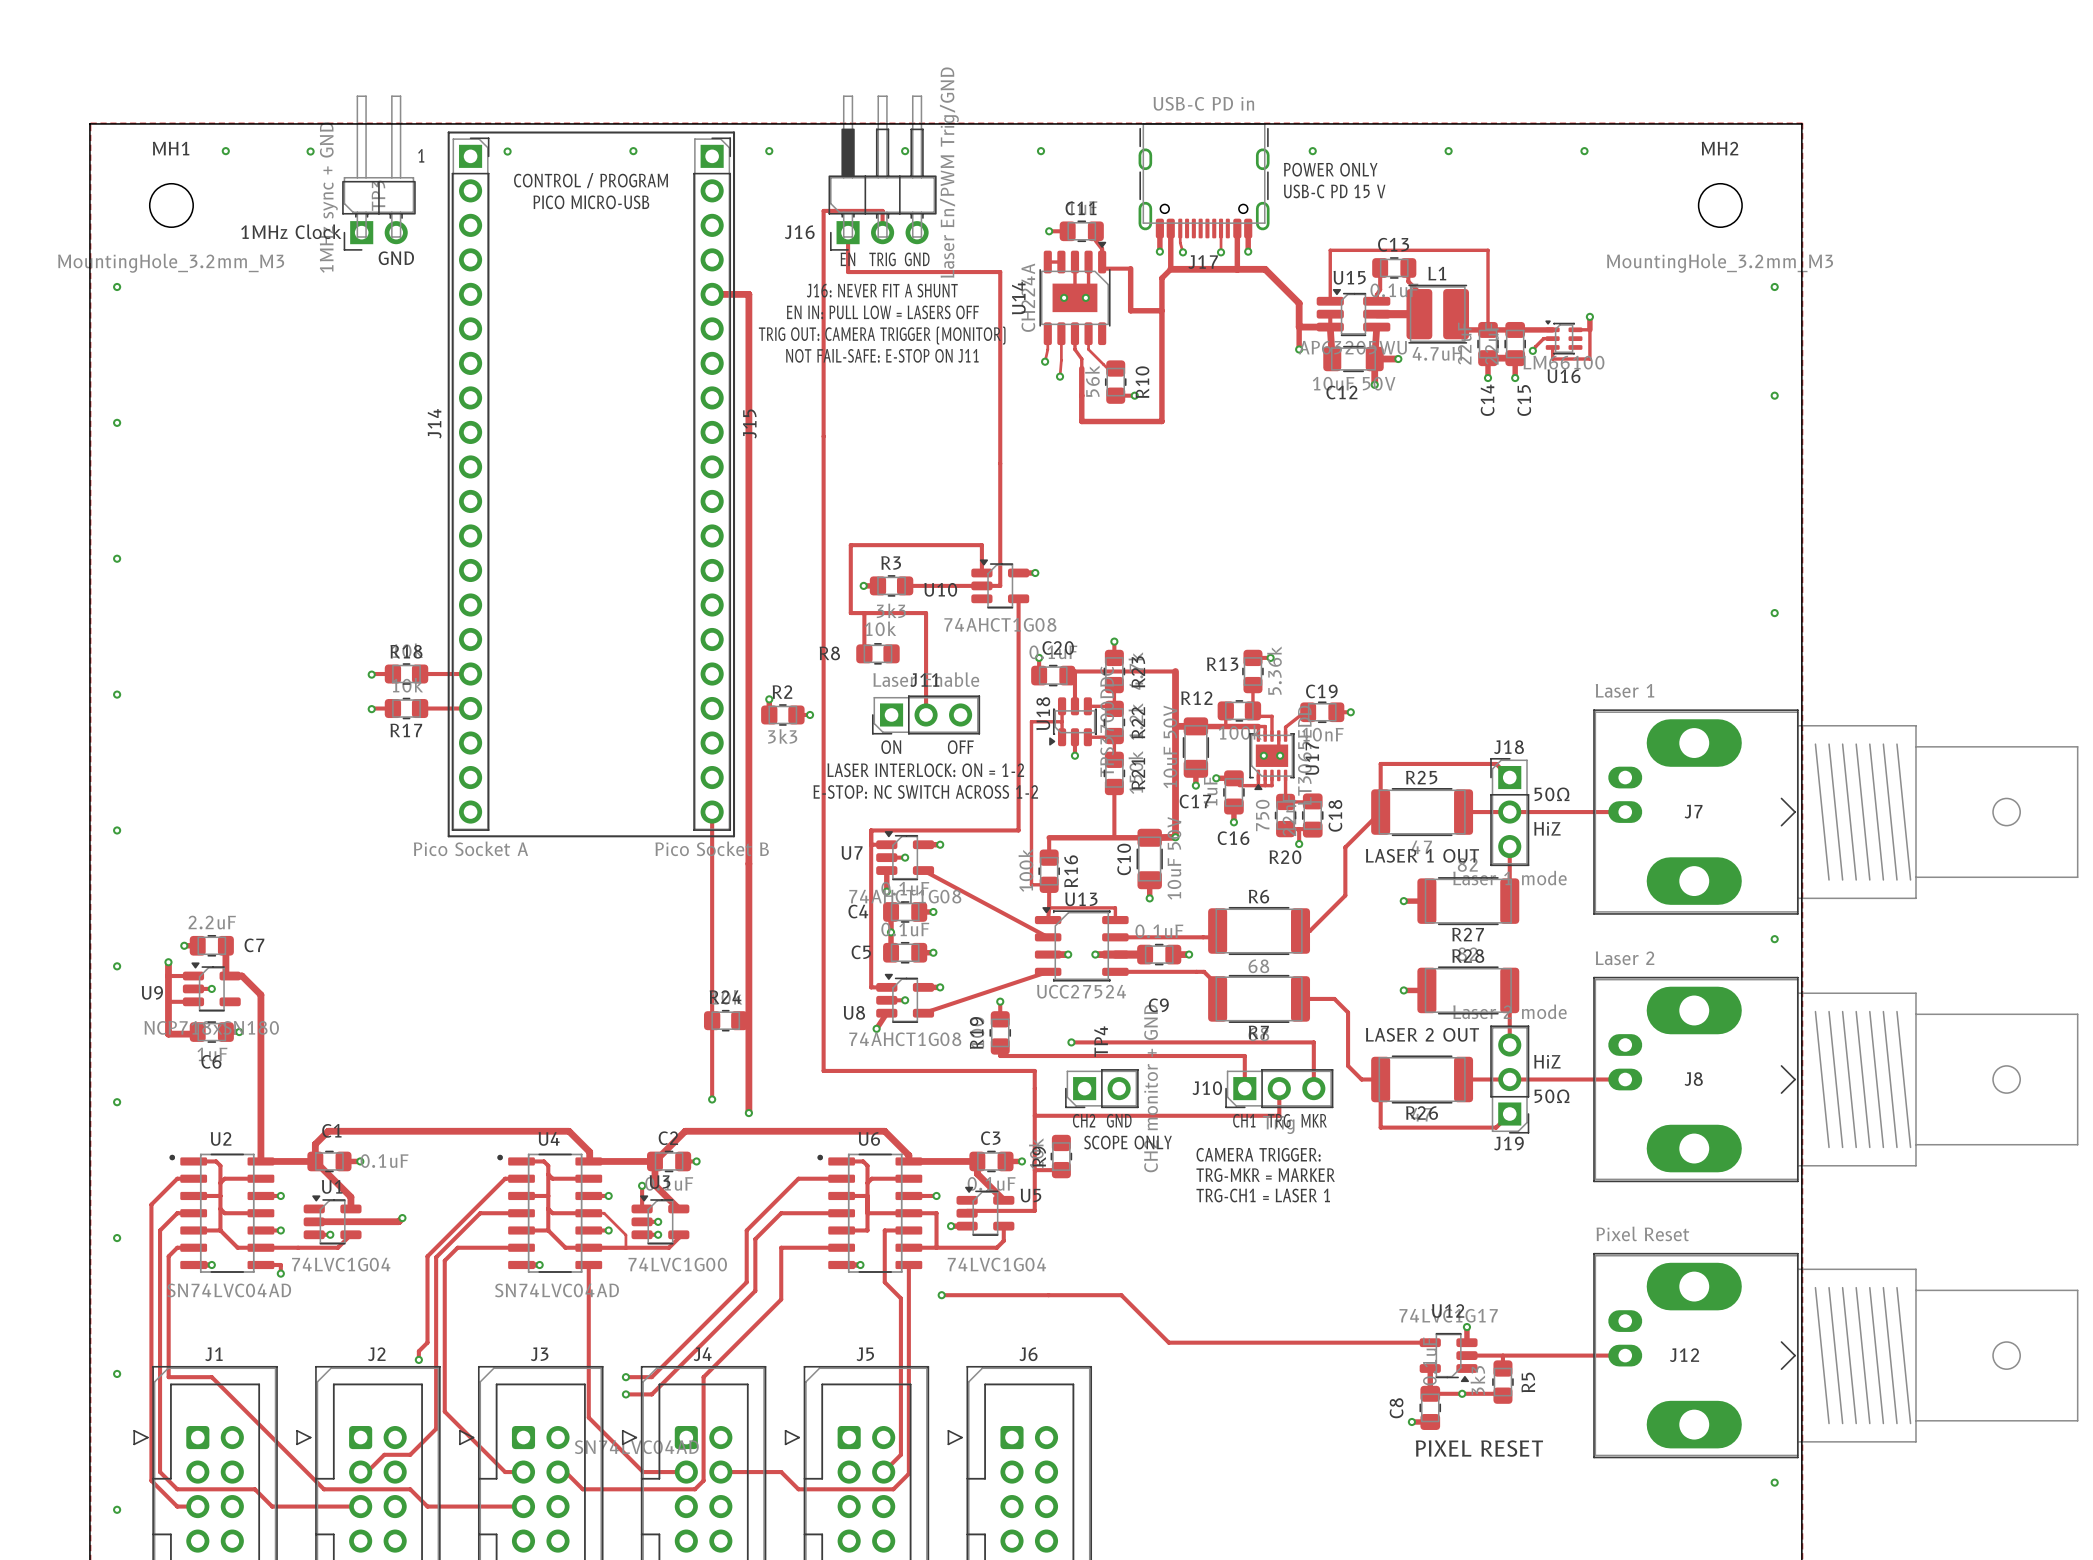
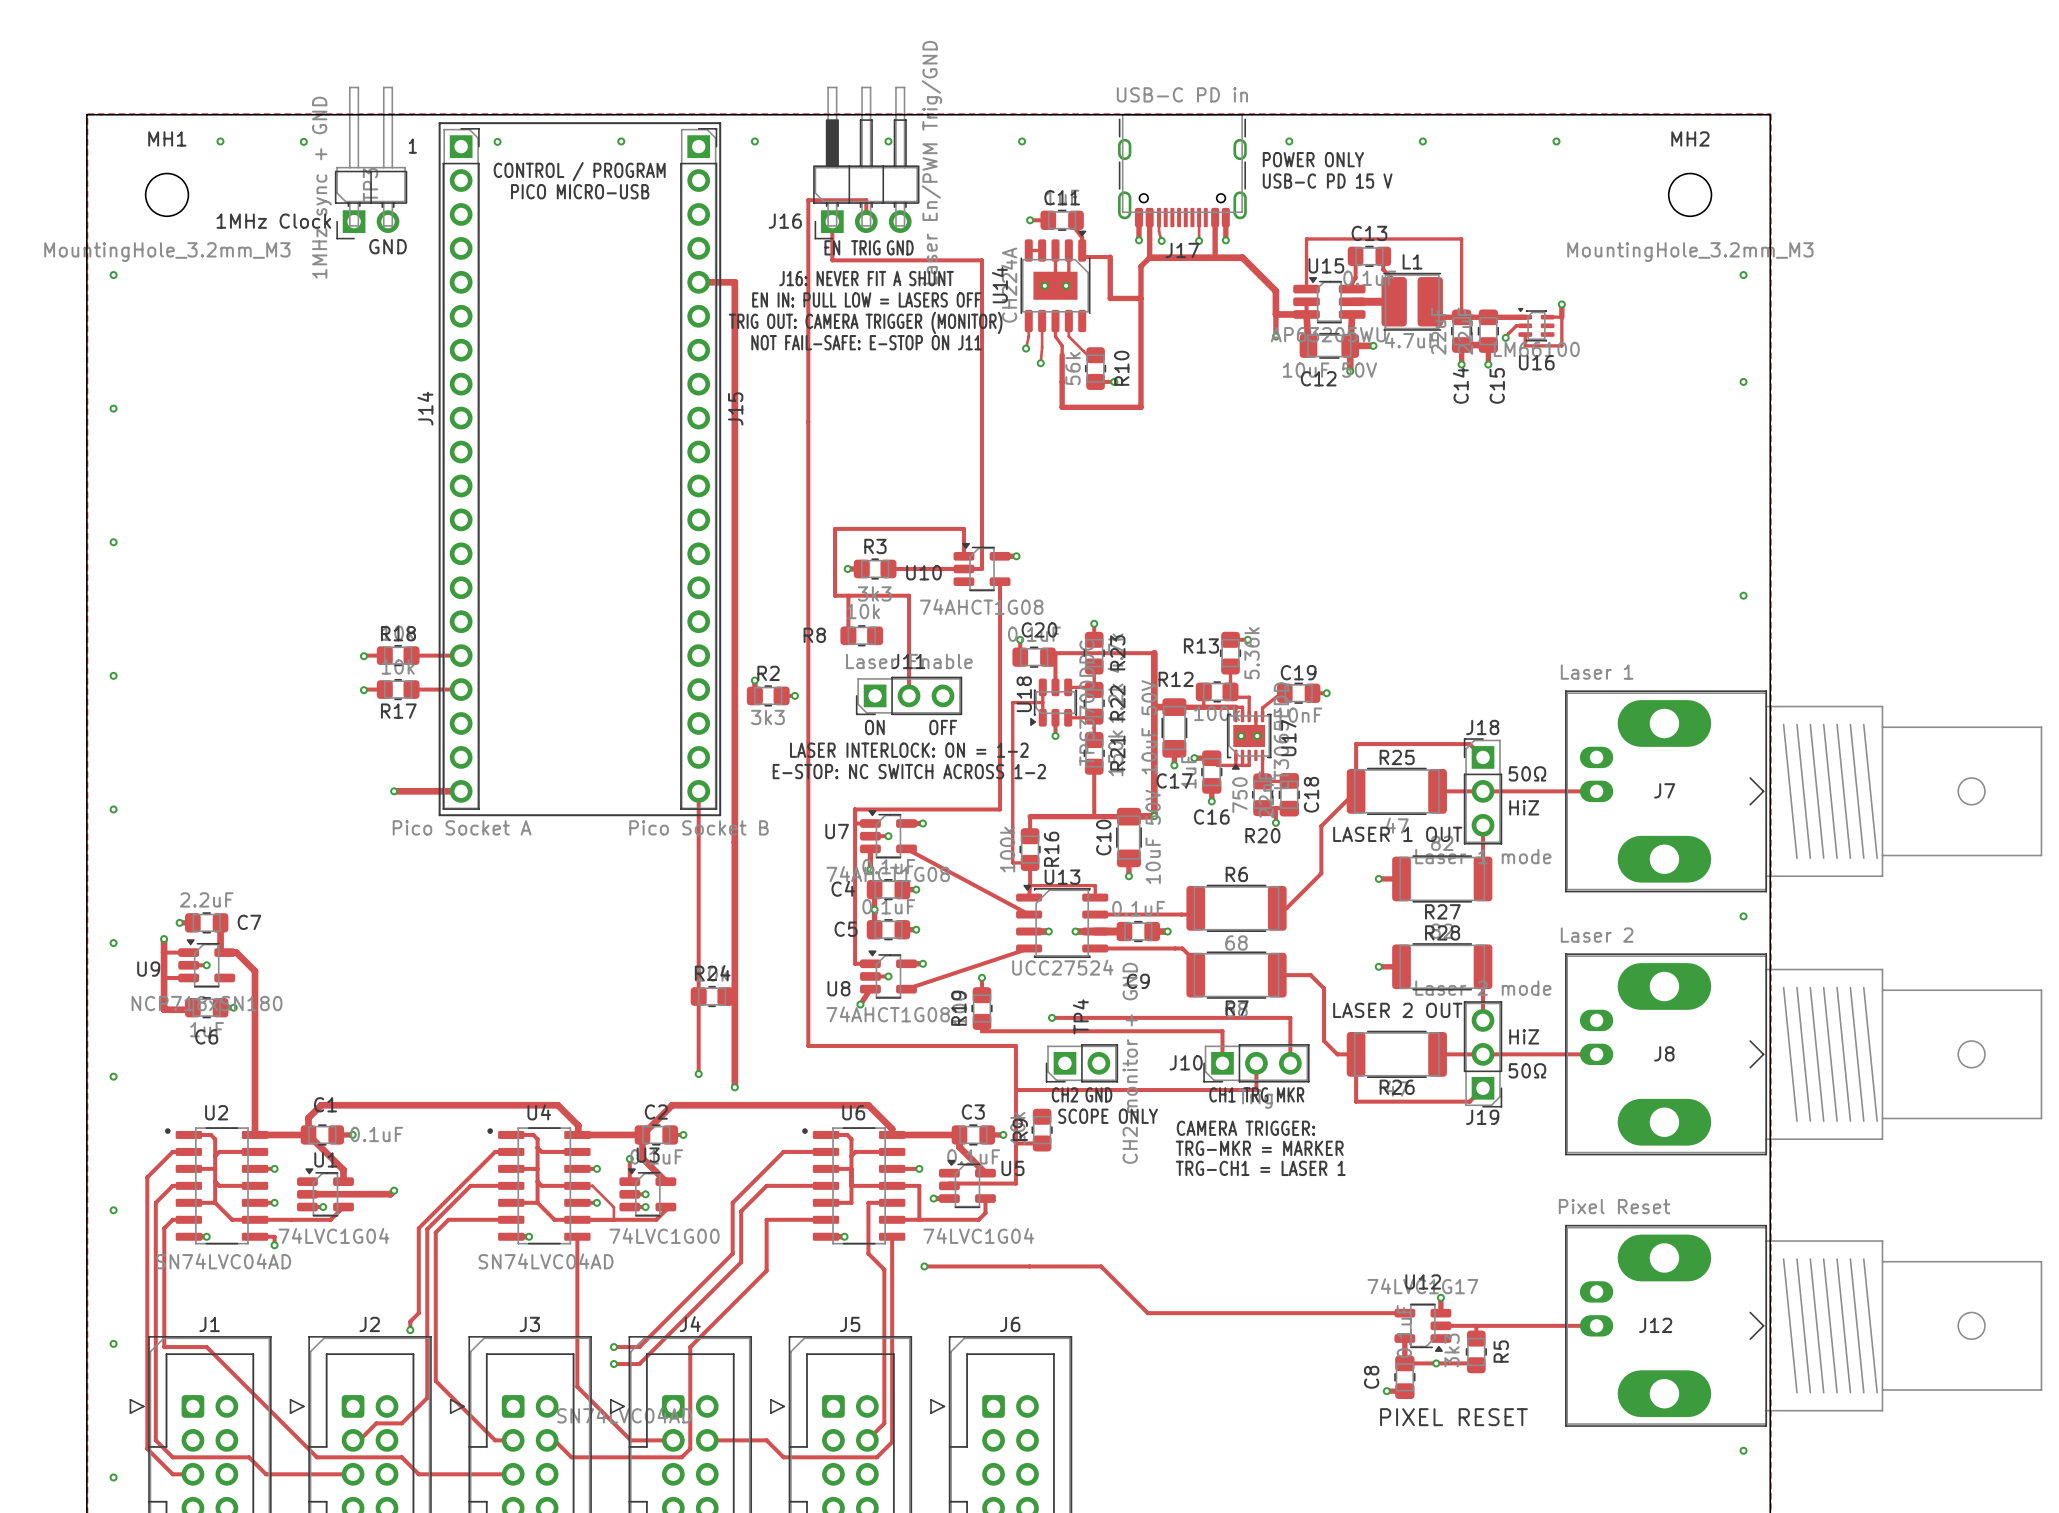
track: none -> (394, 791) (461, 791)
via: none -> (394, 791)

